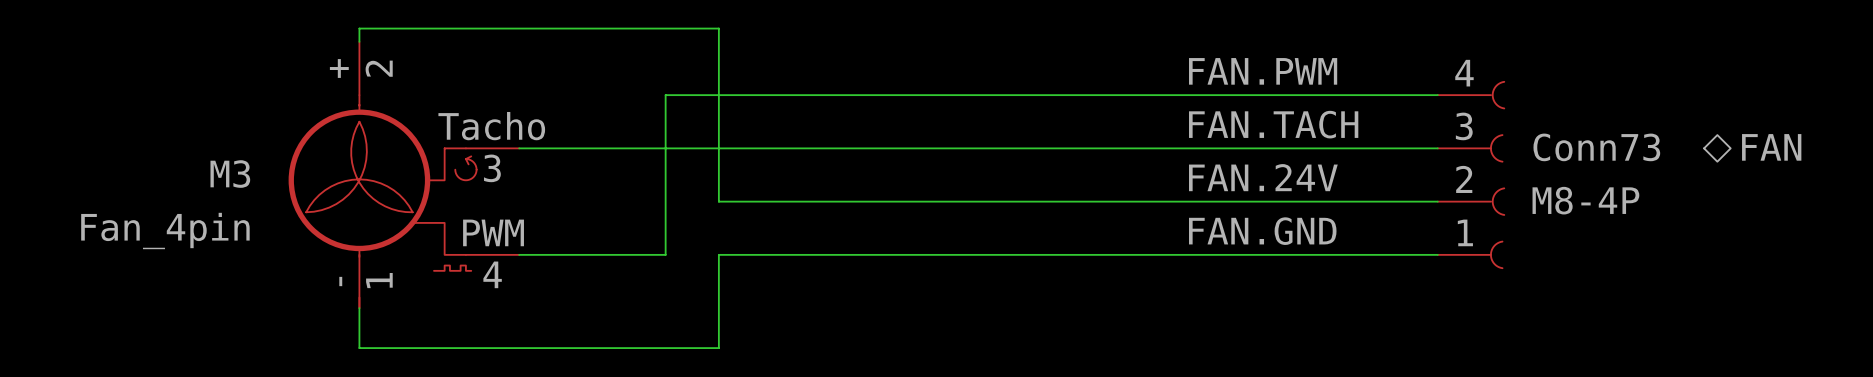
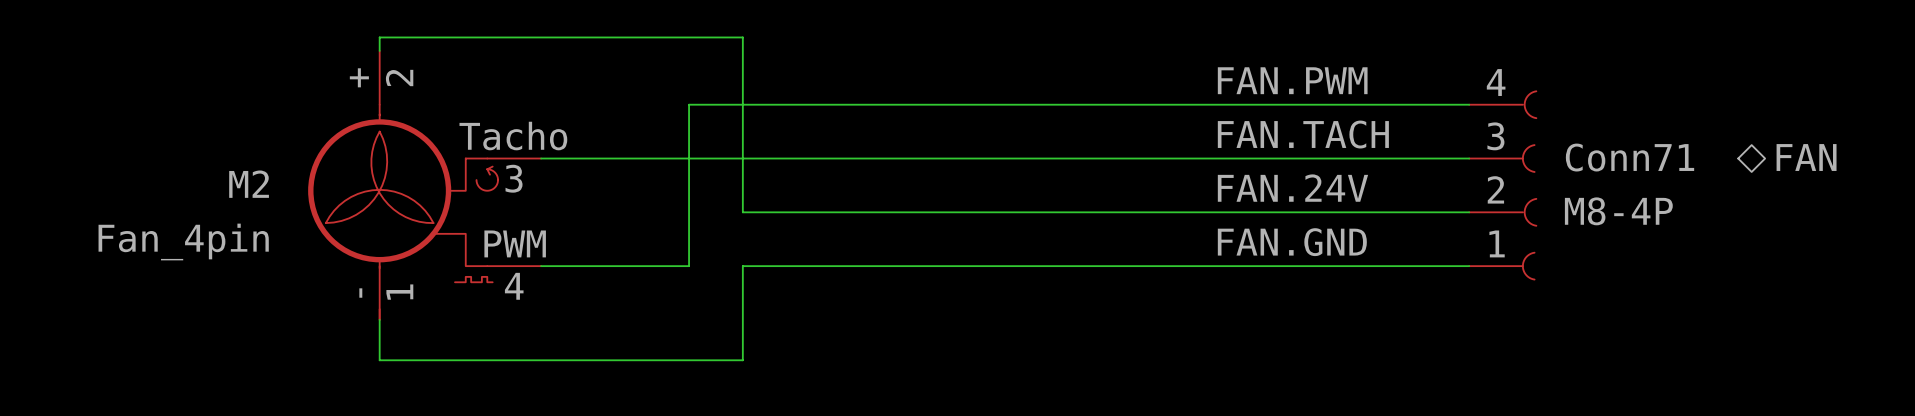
Conn73 name: Conn73 (1596, 147) -> Conn71 (1630, 157)
M3 name: M3 (230, 174) -> M2 (249, 184)

